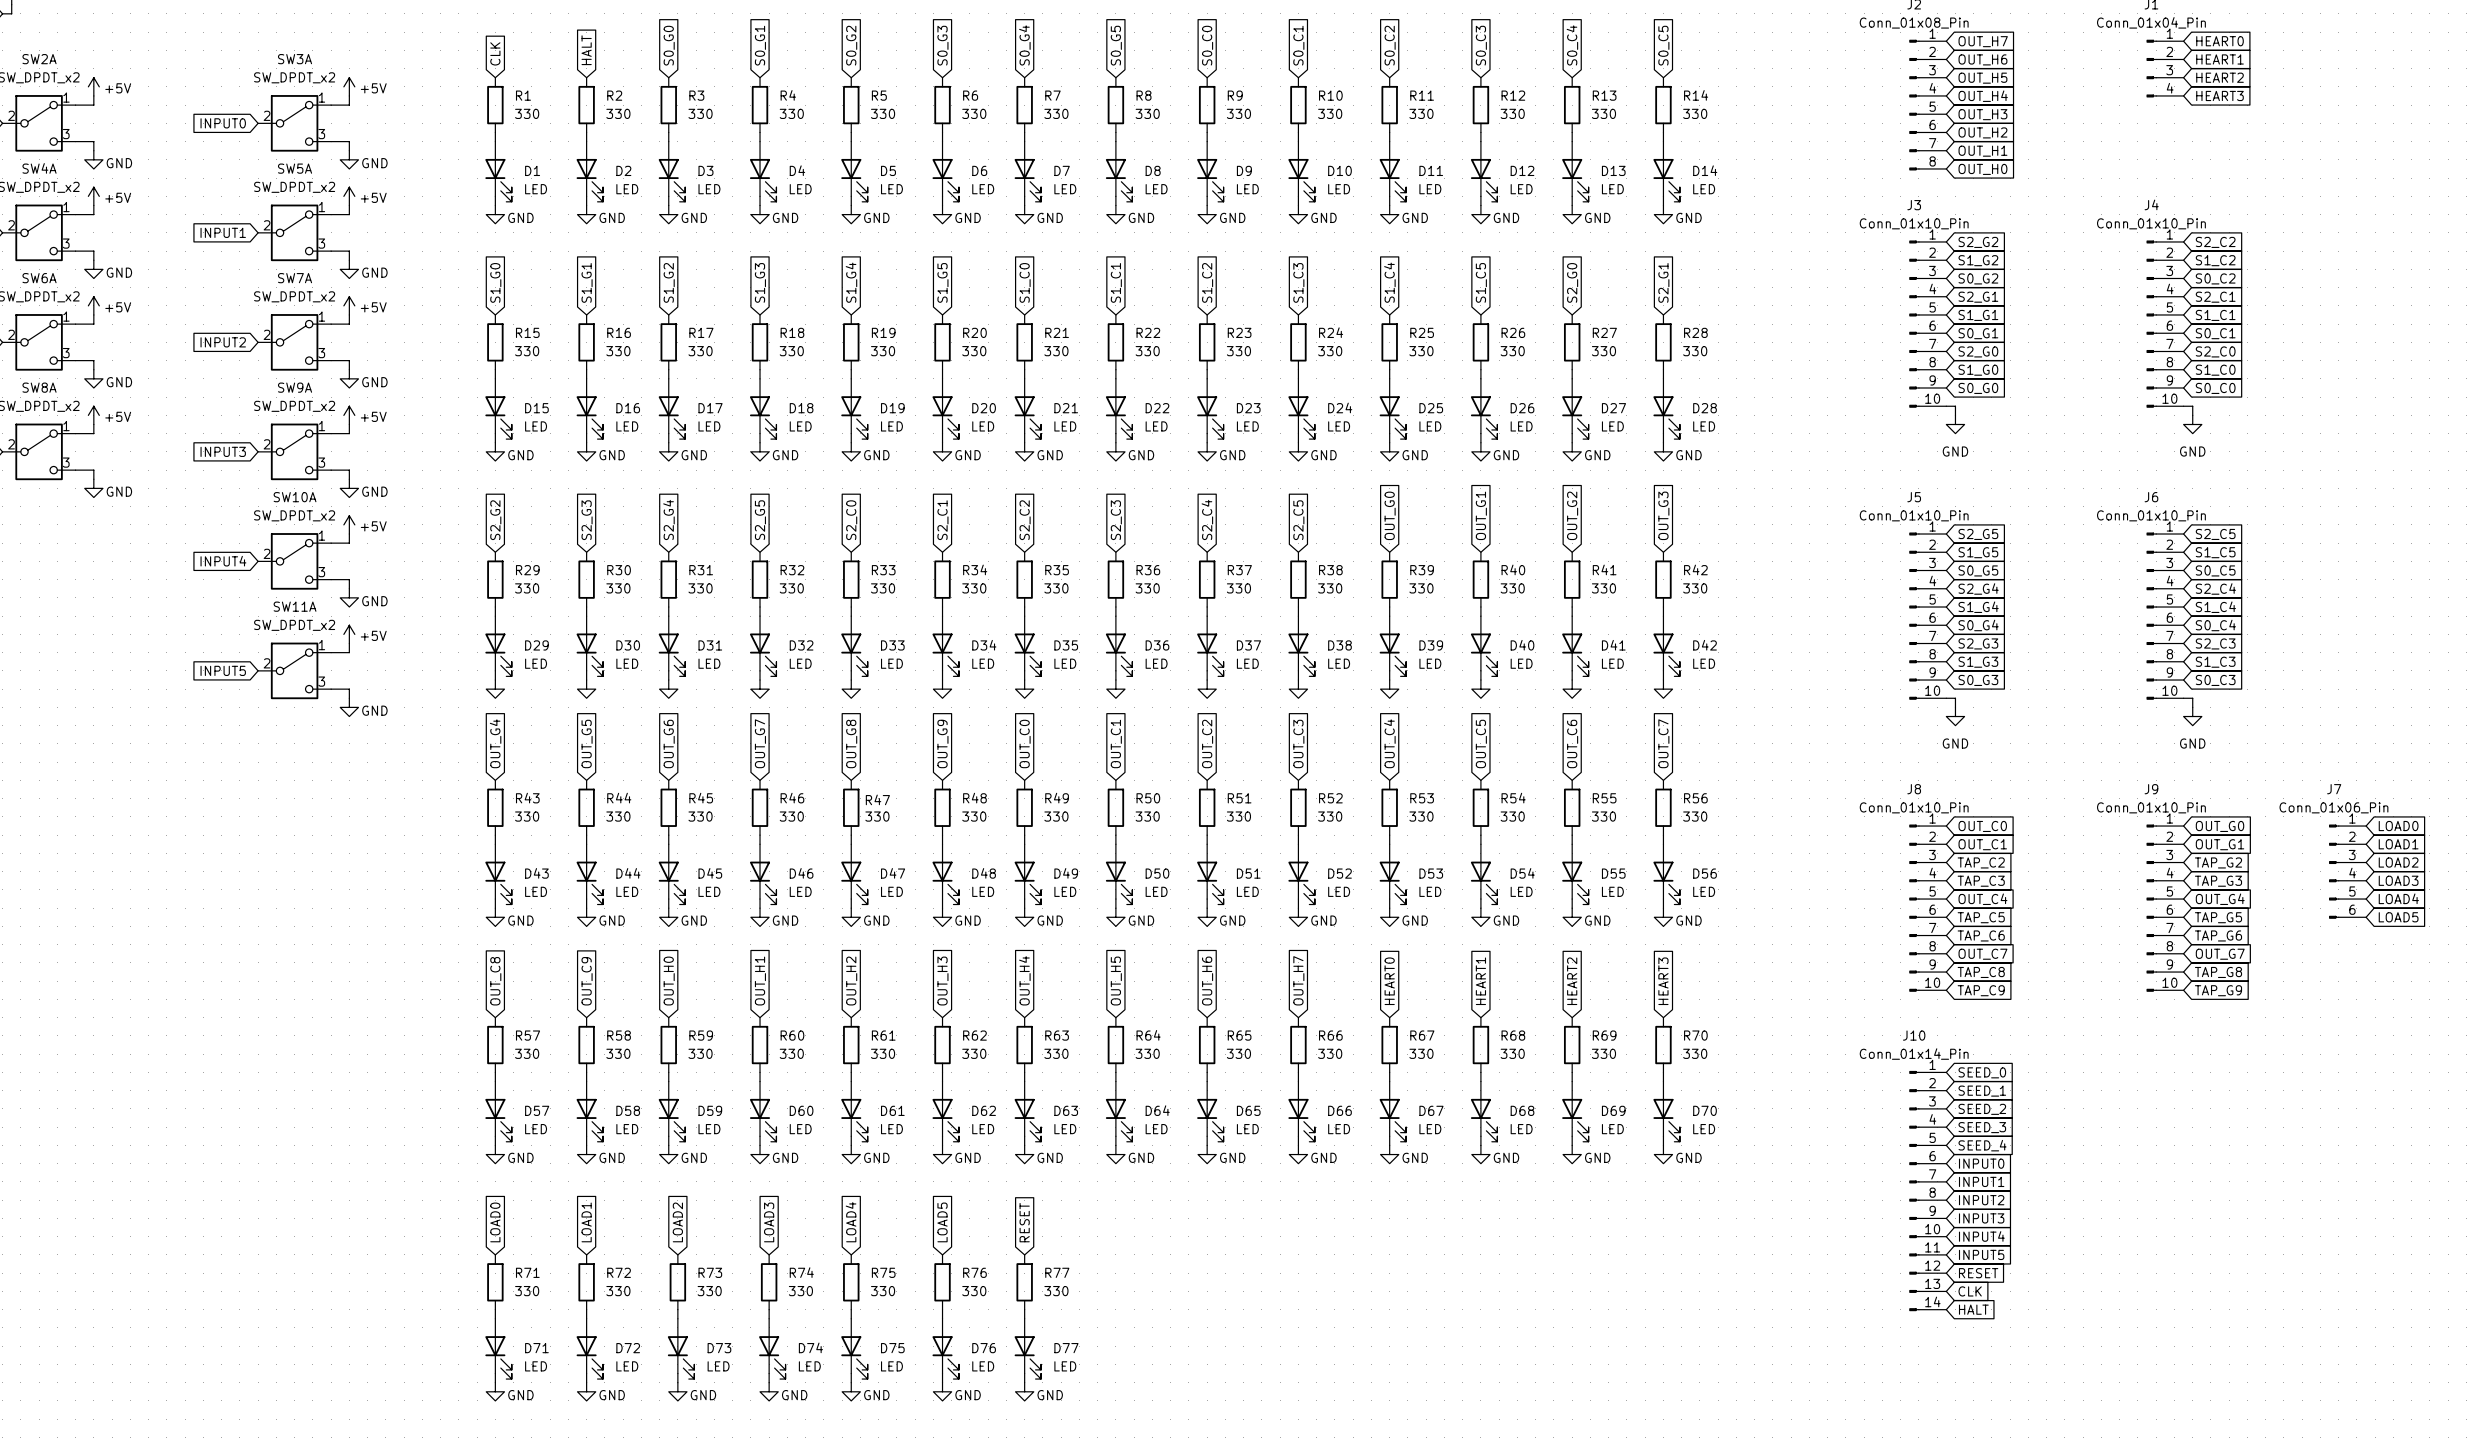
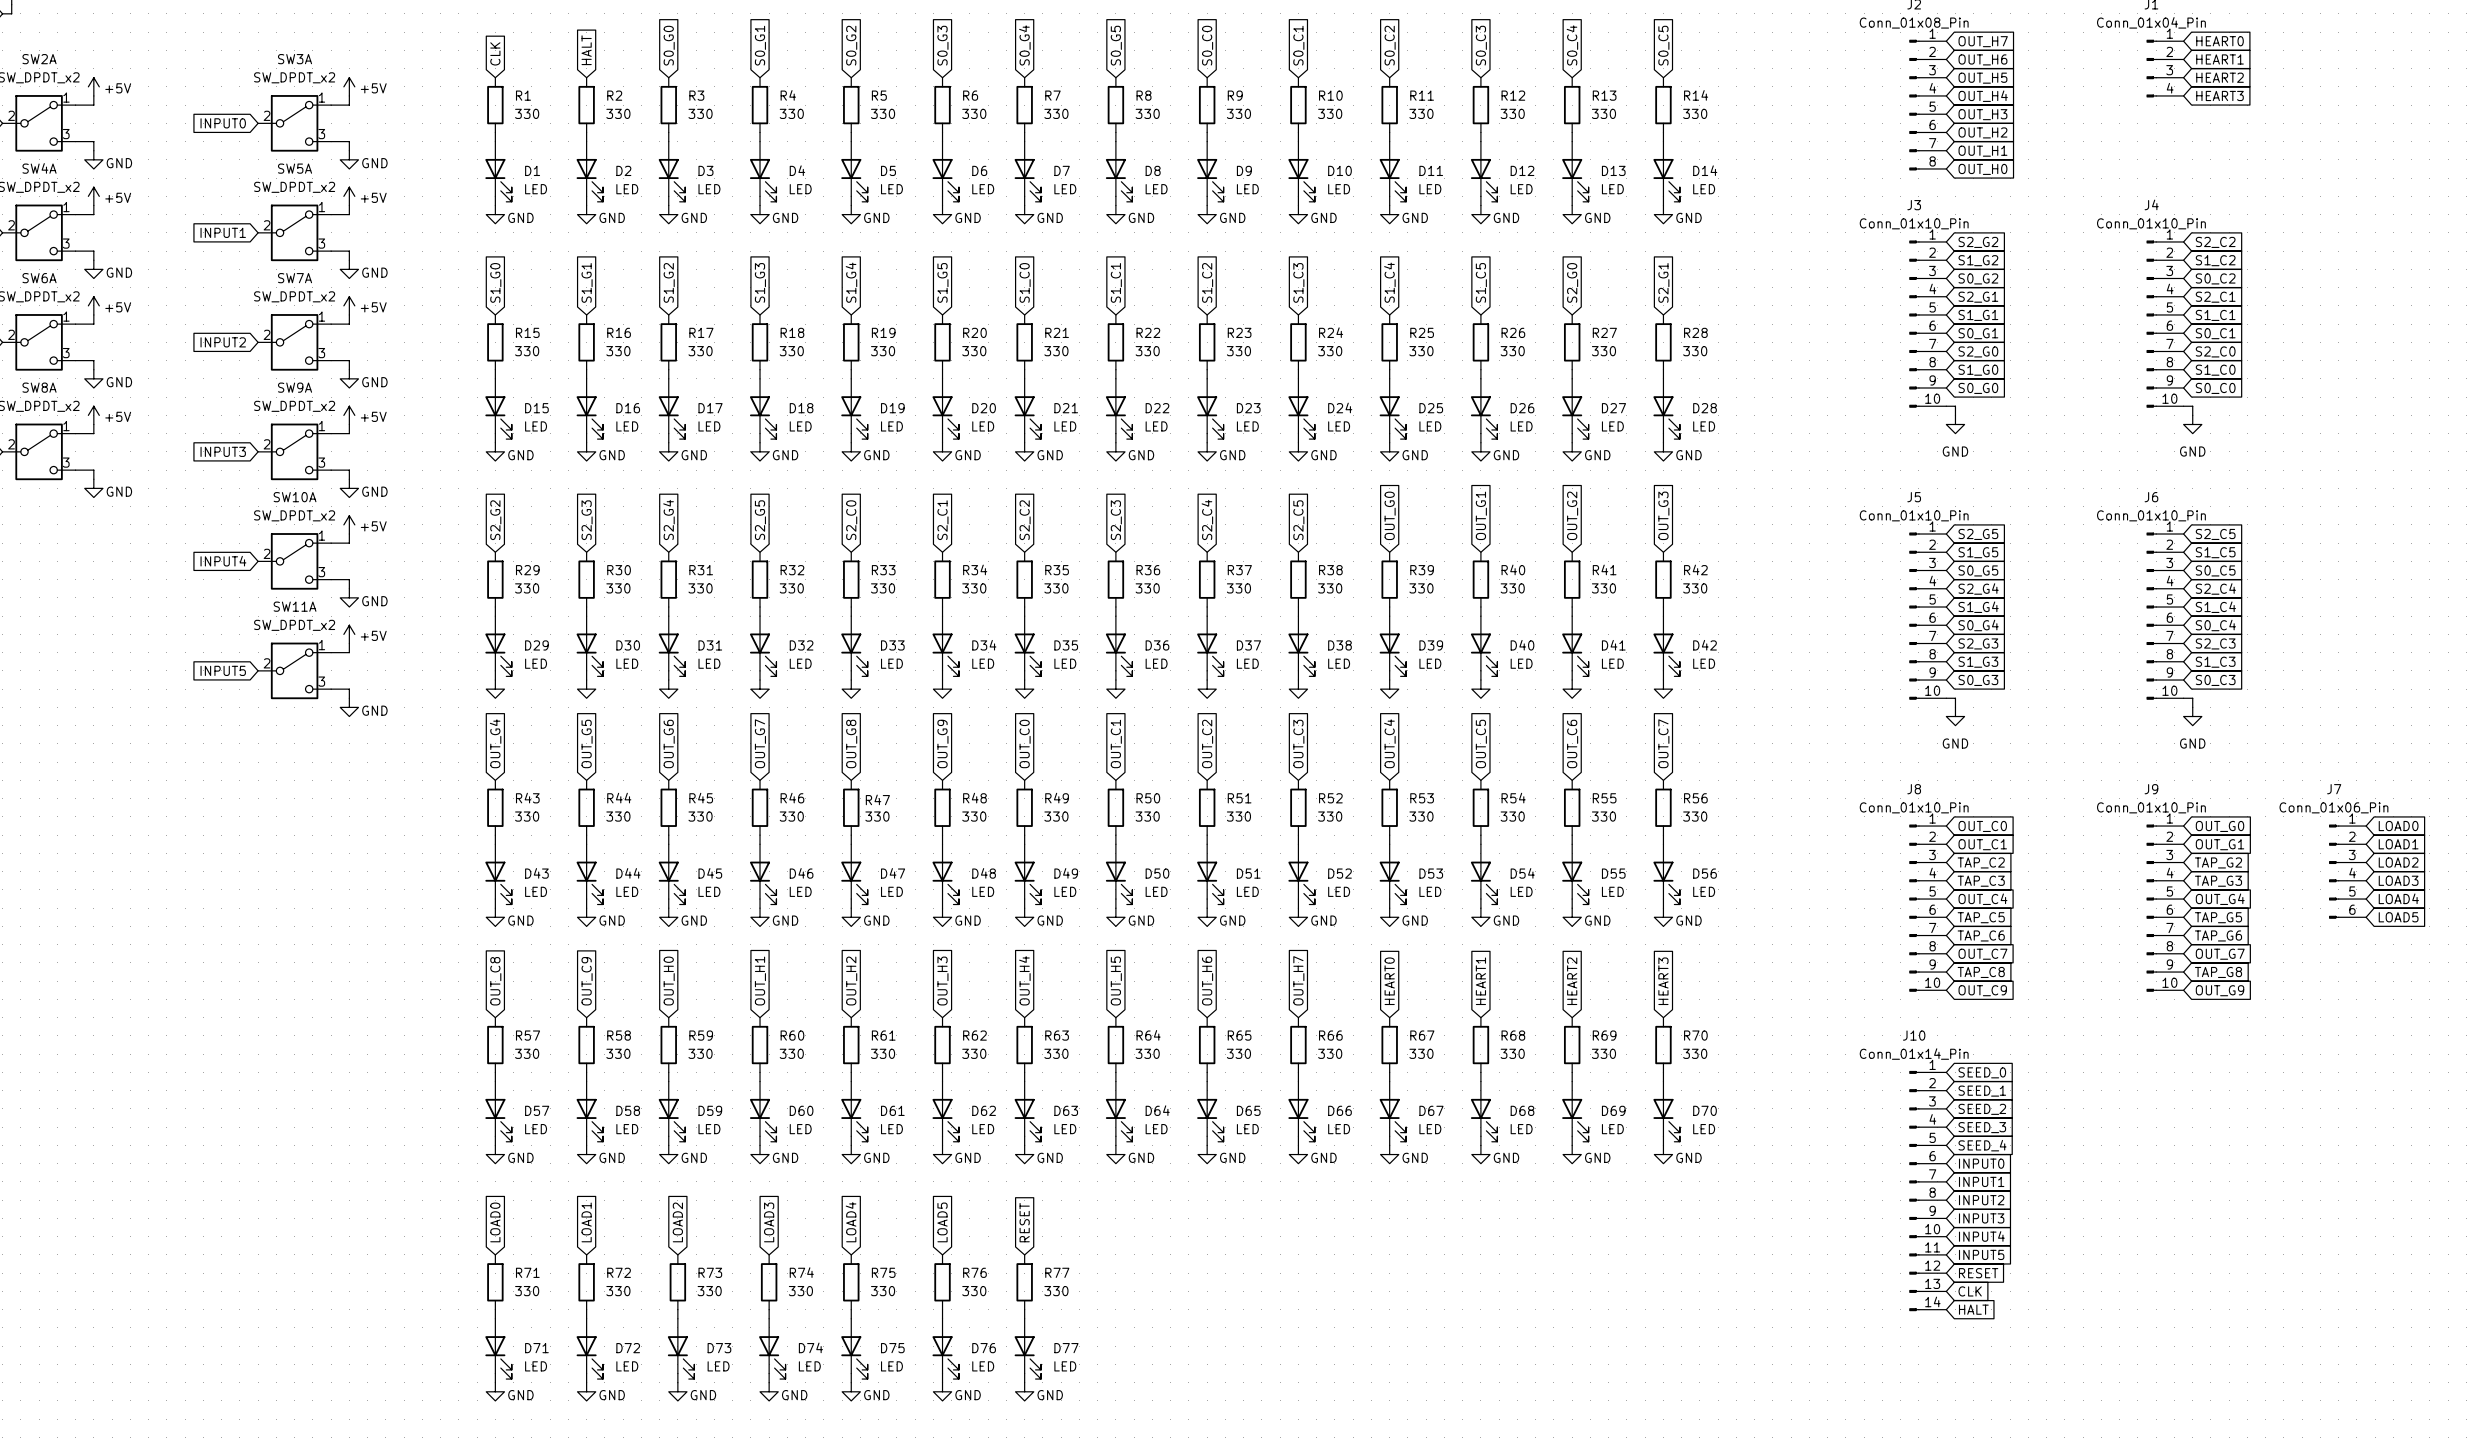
global label: TAP_C9 (1981, 990) -> OUT_C9 (1982, 990)
global label: TAP_G9 (2218, 990) -> OUT_G9 (2220, 990)

